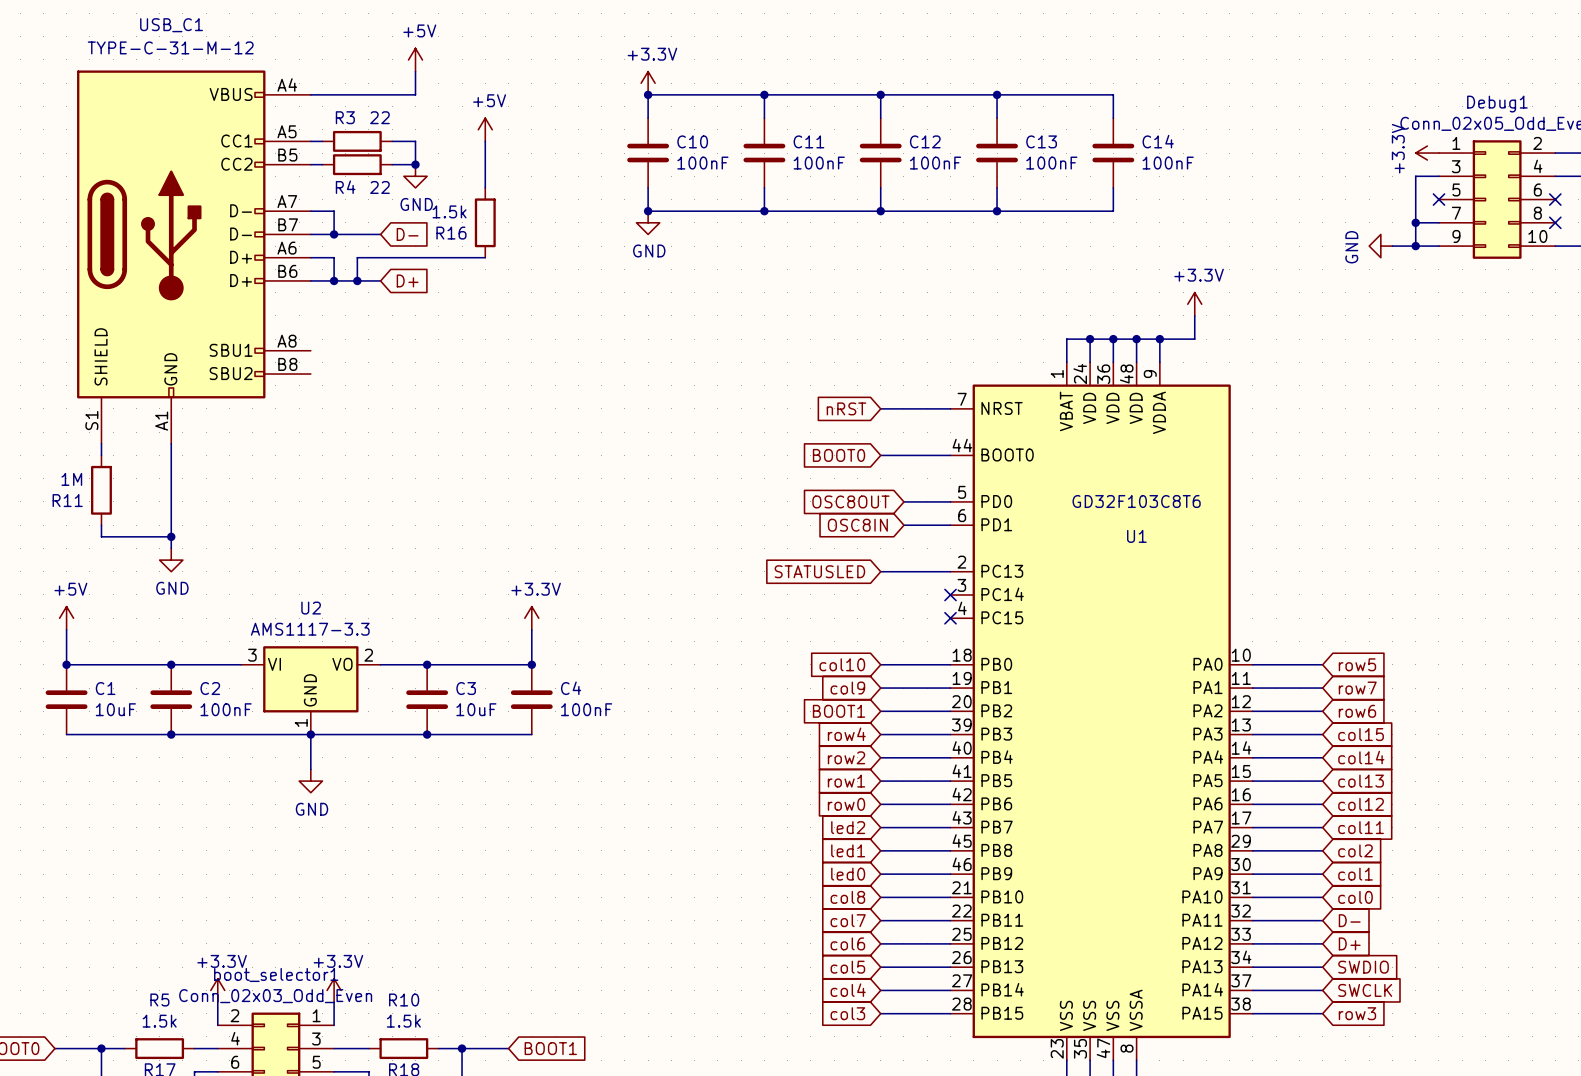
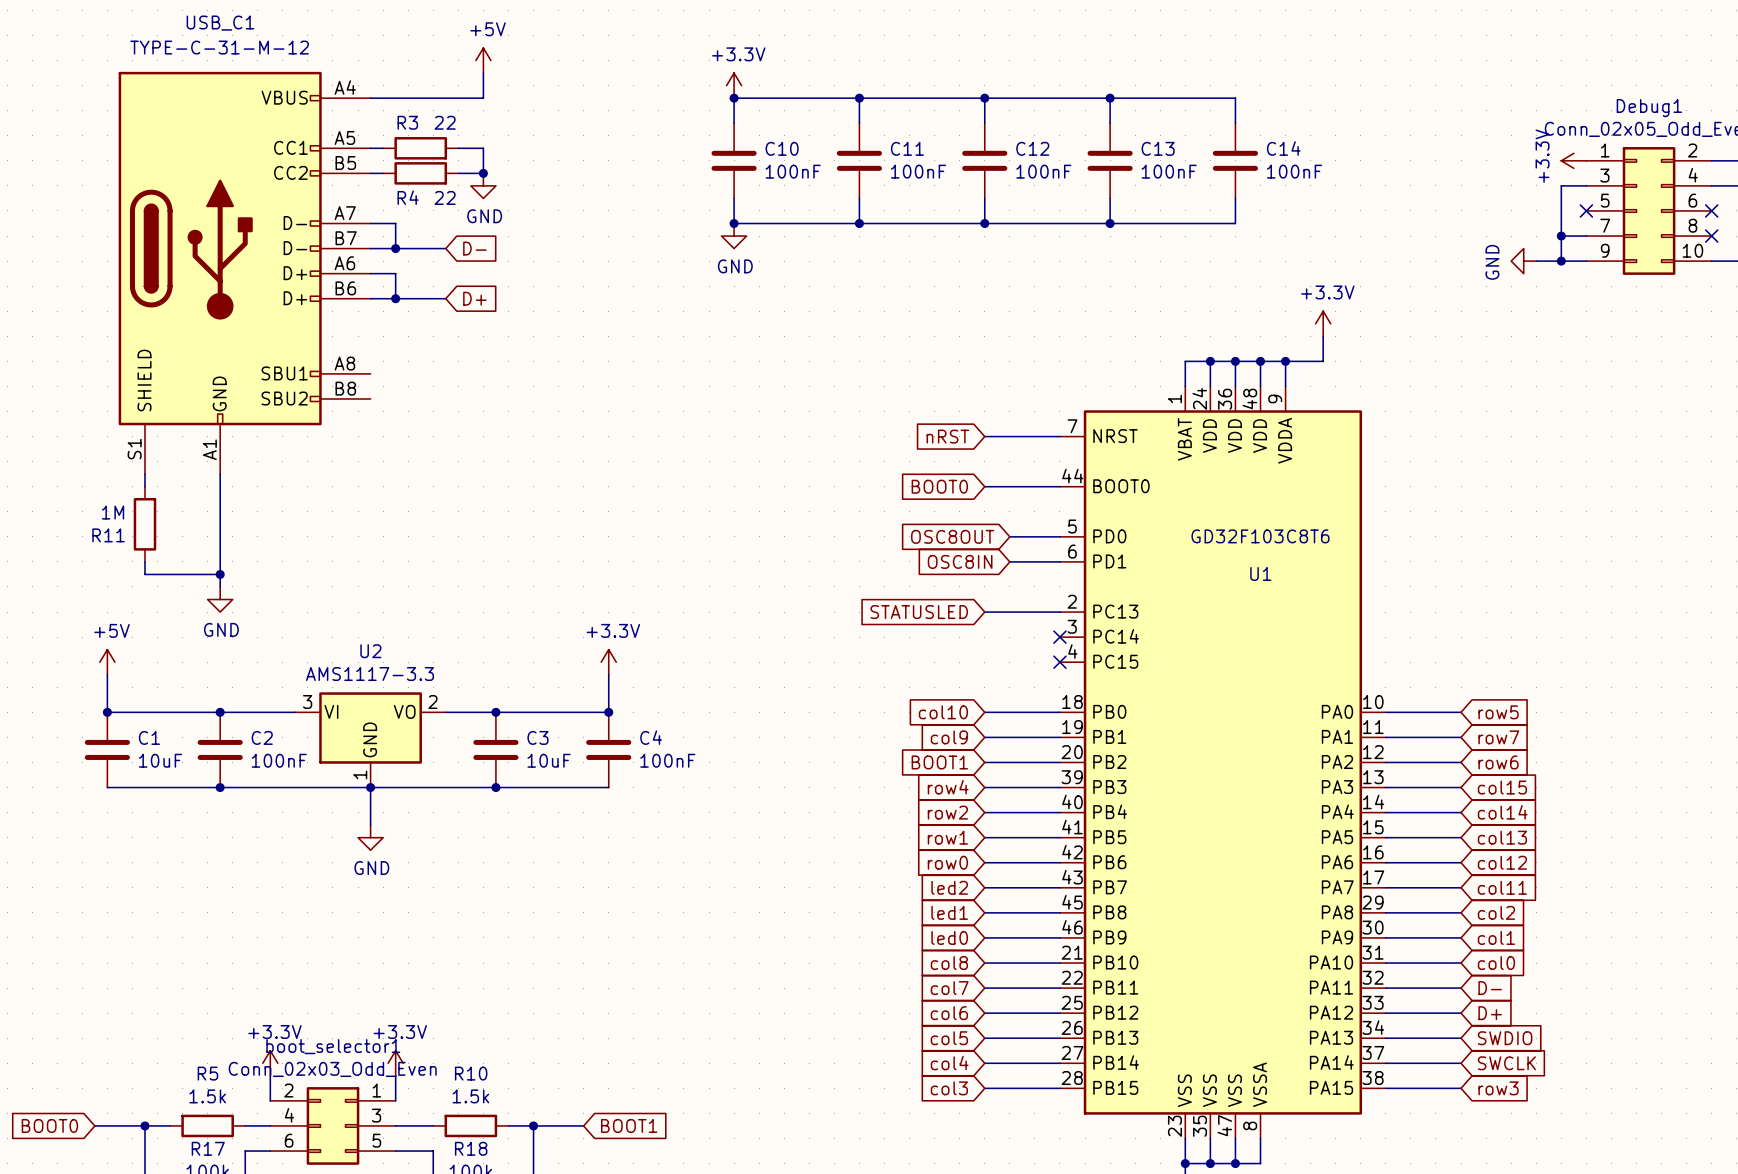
power symbol: +5V (485, 129) -> none
wire: (485, 141) (485, 187) -> none
R16: 1.5k (485, 222) -> none
wire: (485, 257) (357, 257) (357, 280) -> none
junction: (357, 280) -> none

